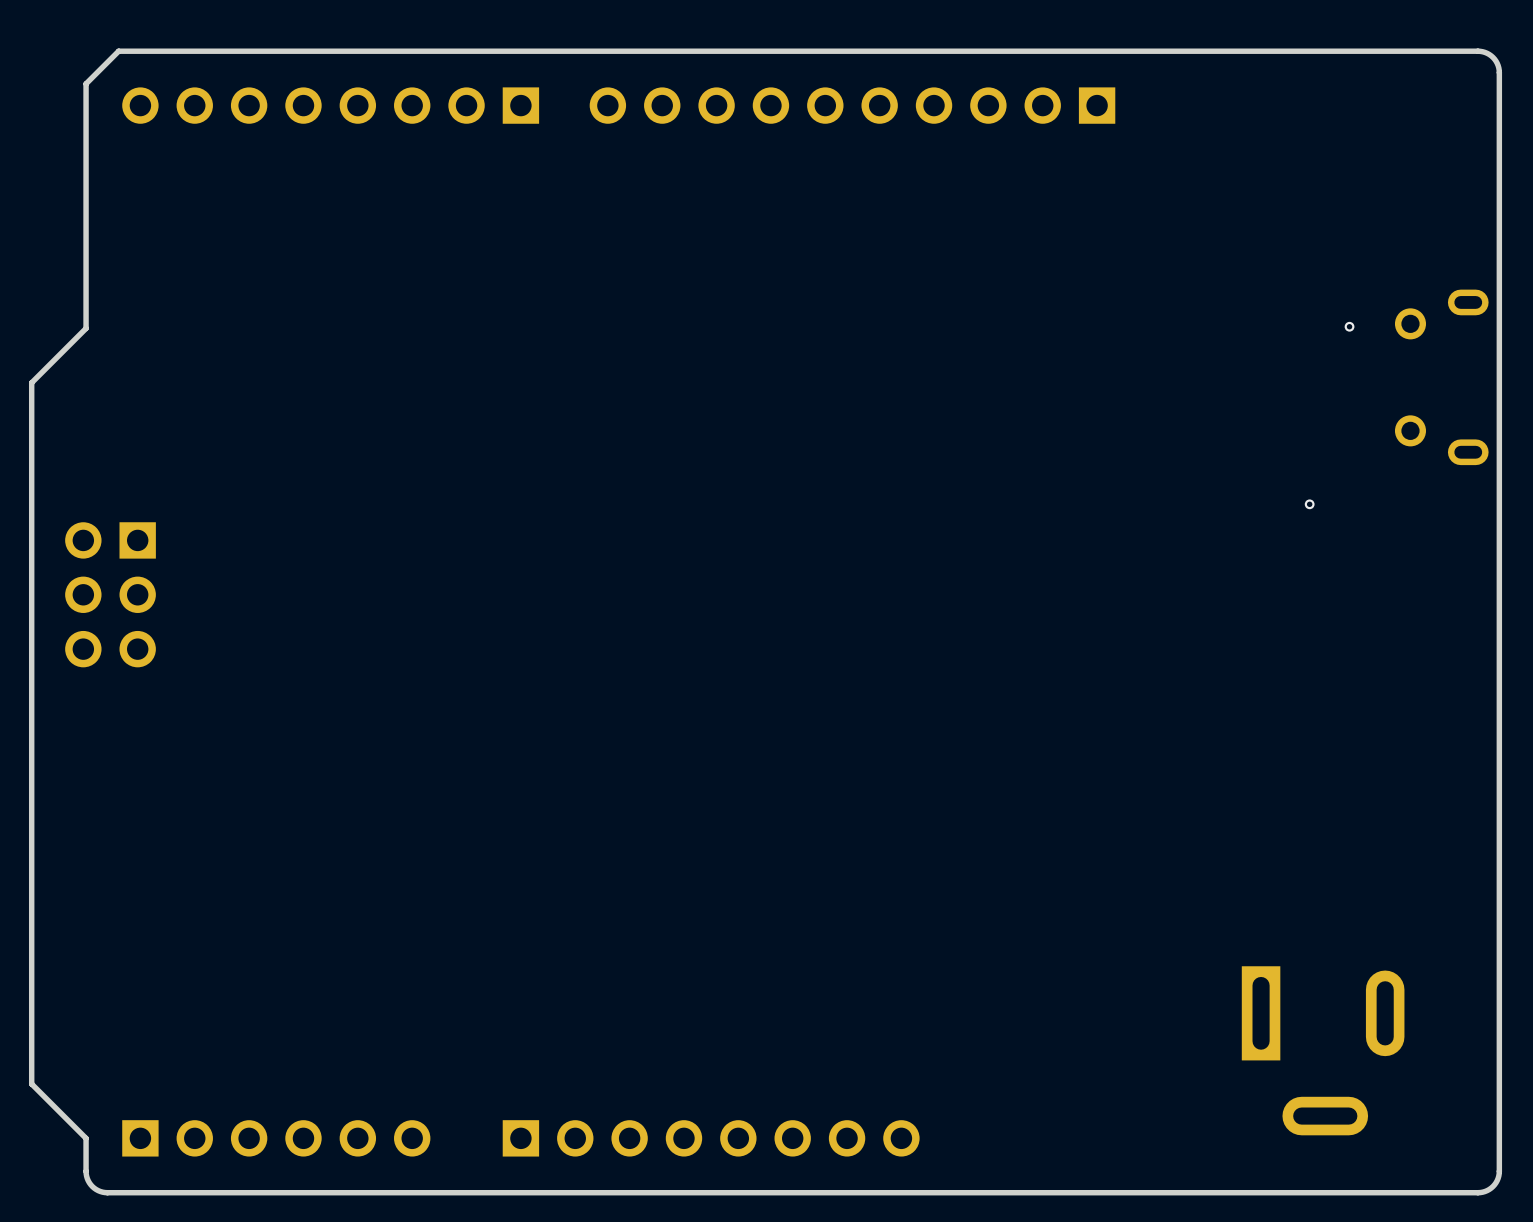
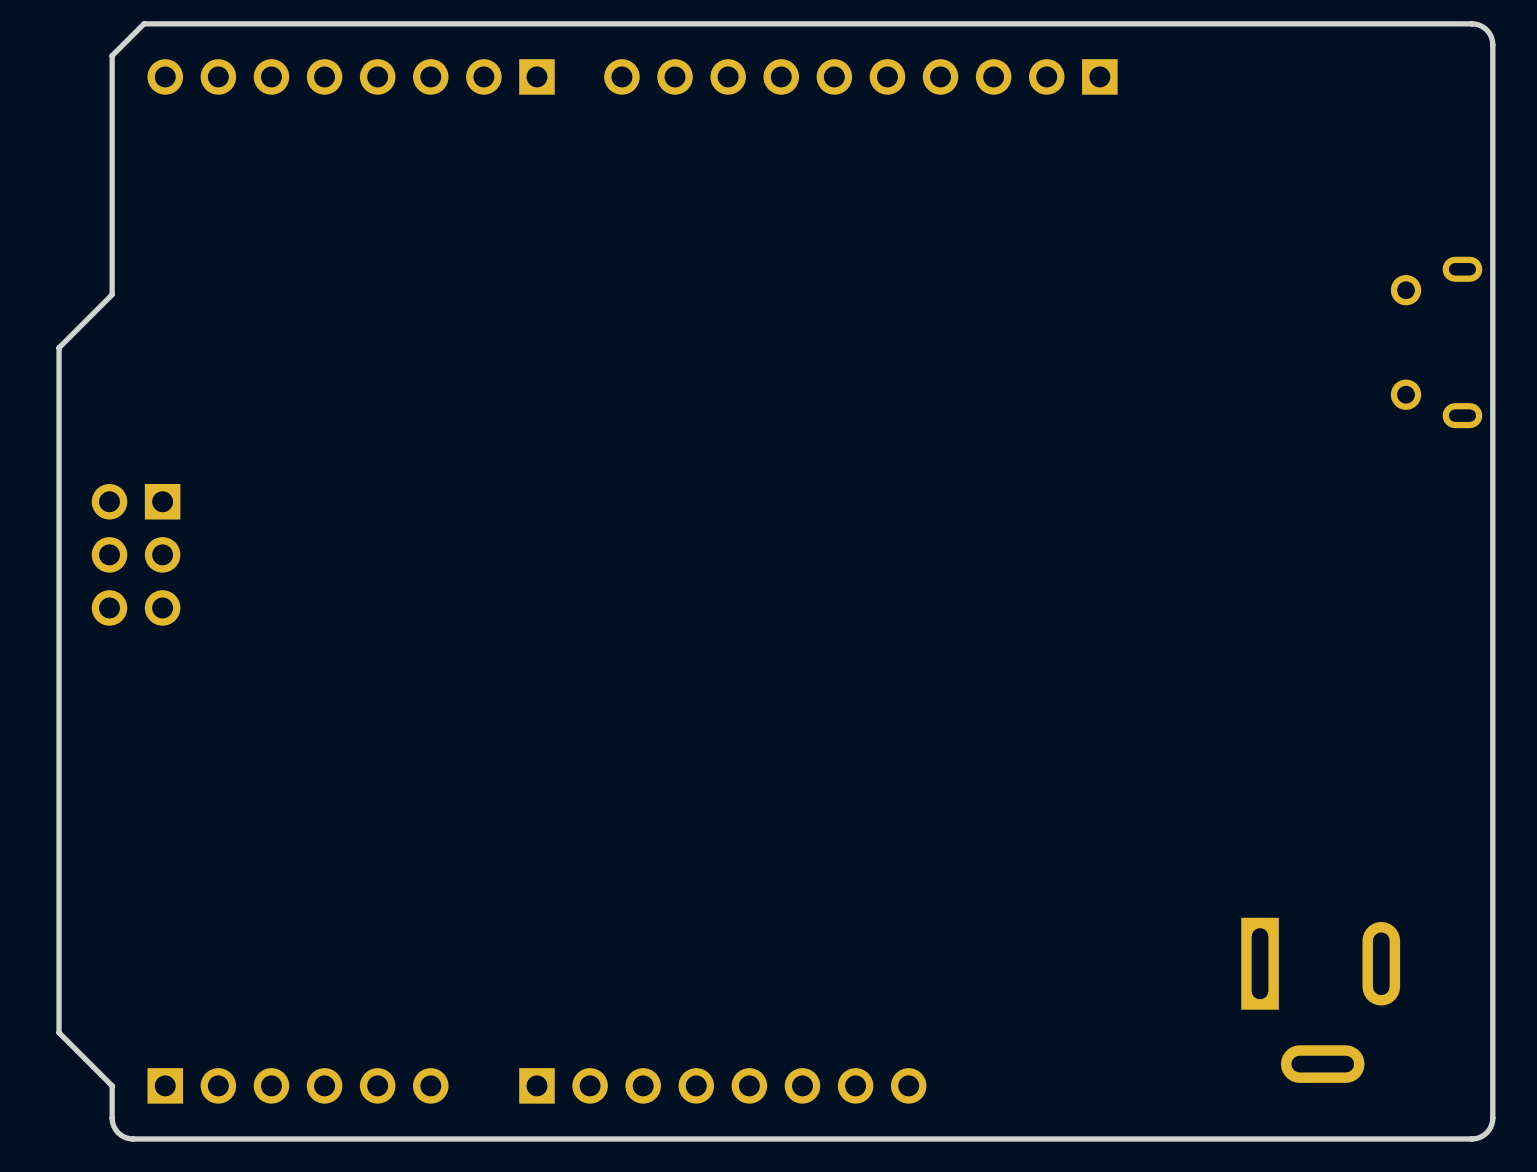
via: (1349, 326) -> none
via: (1309, 504) -> none

